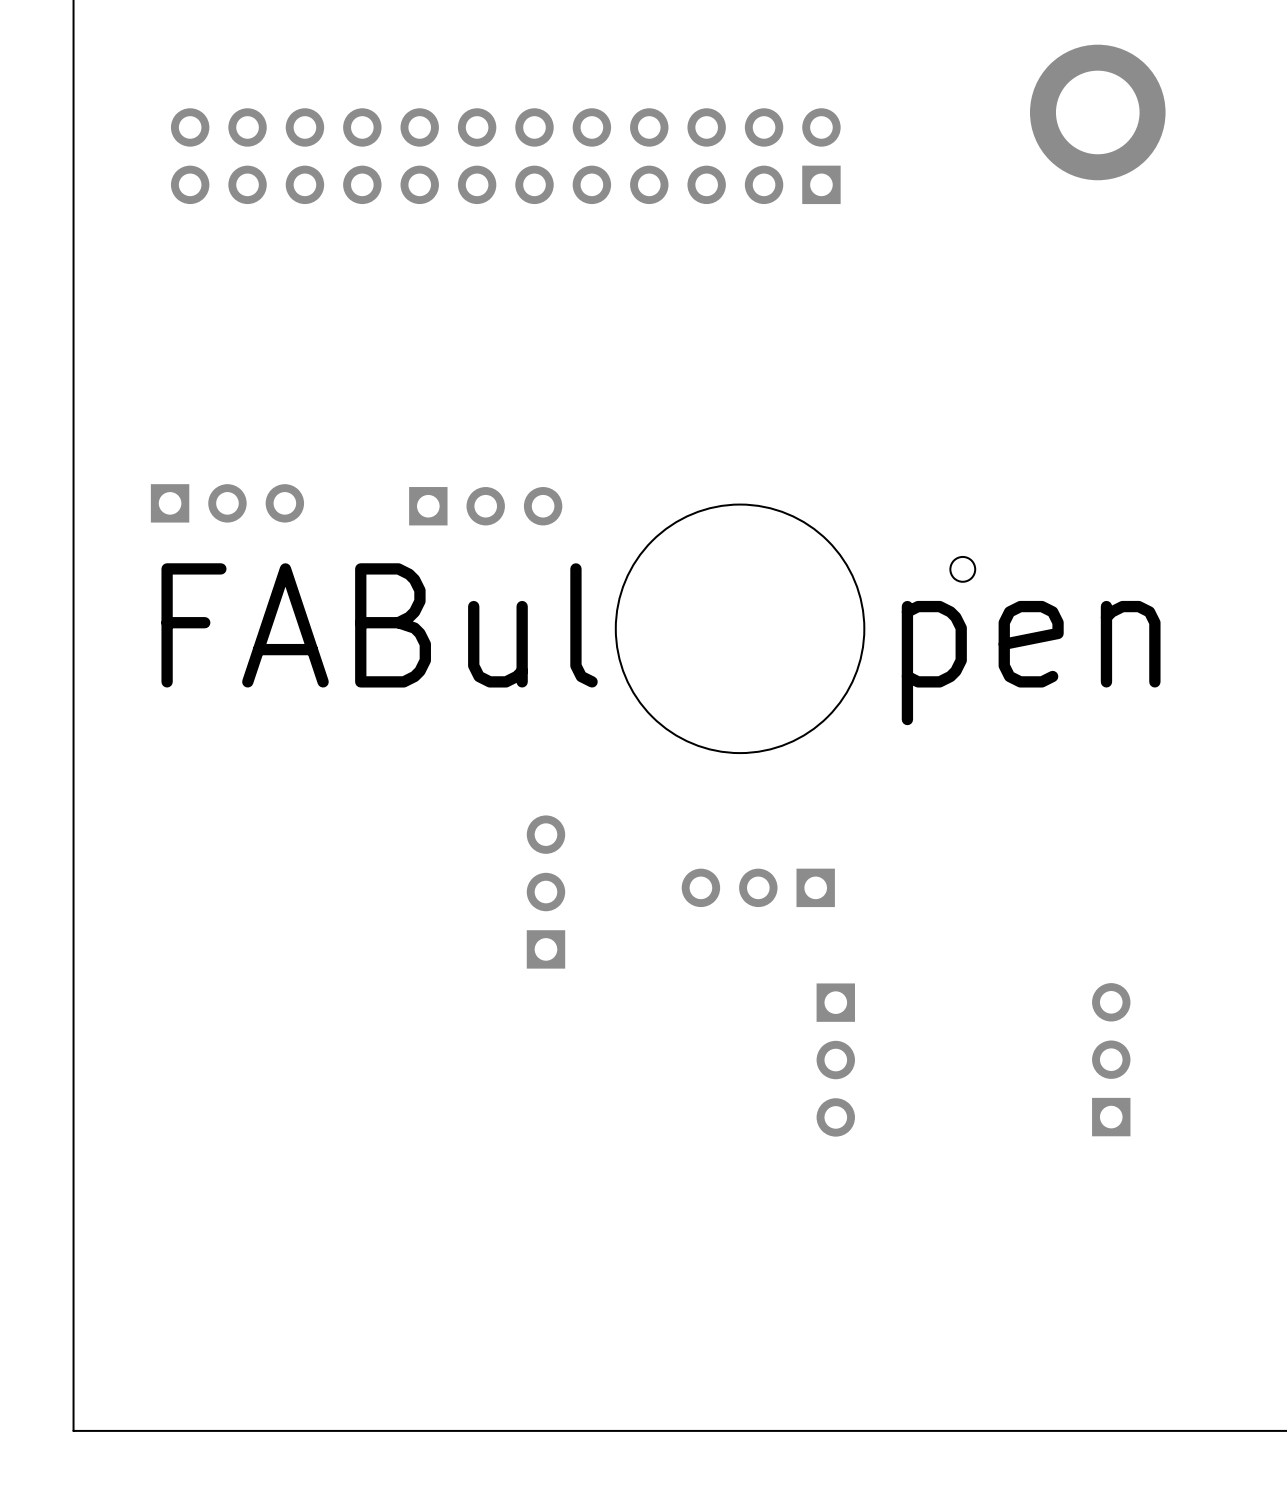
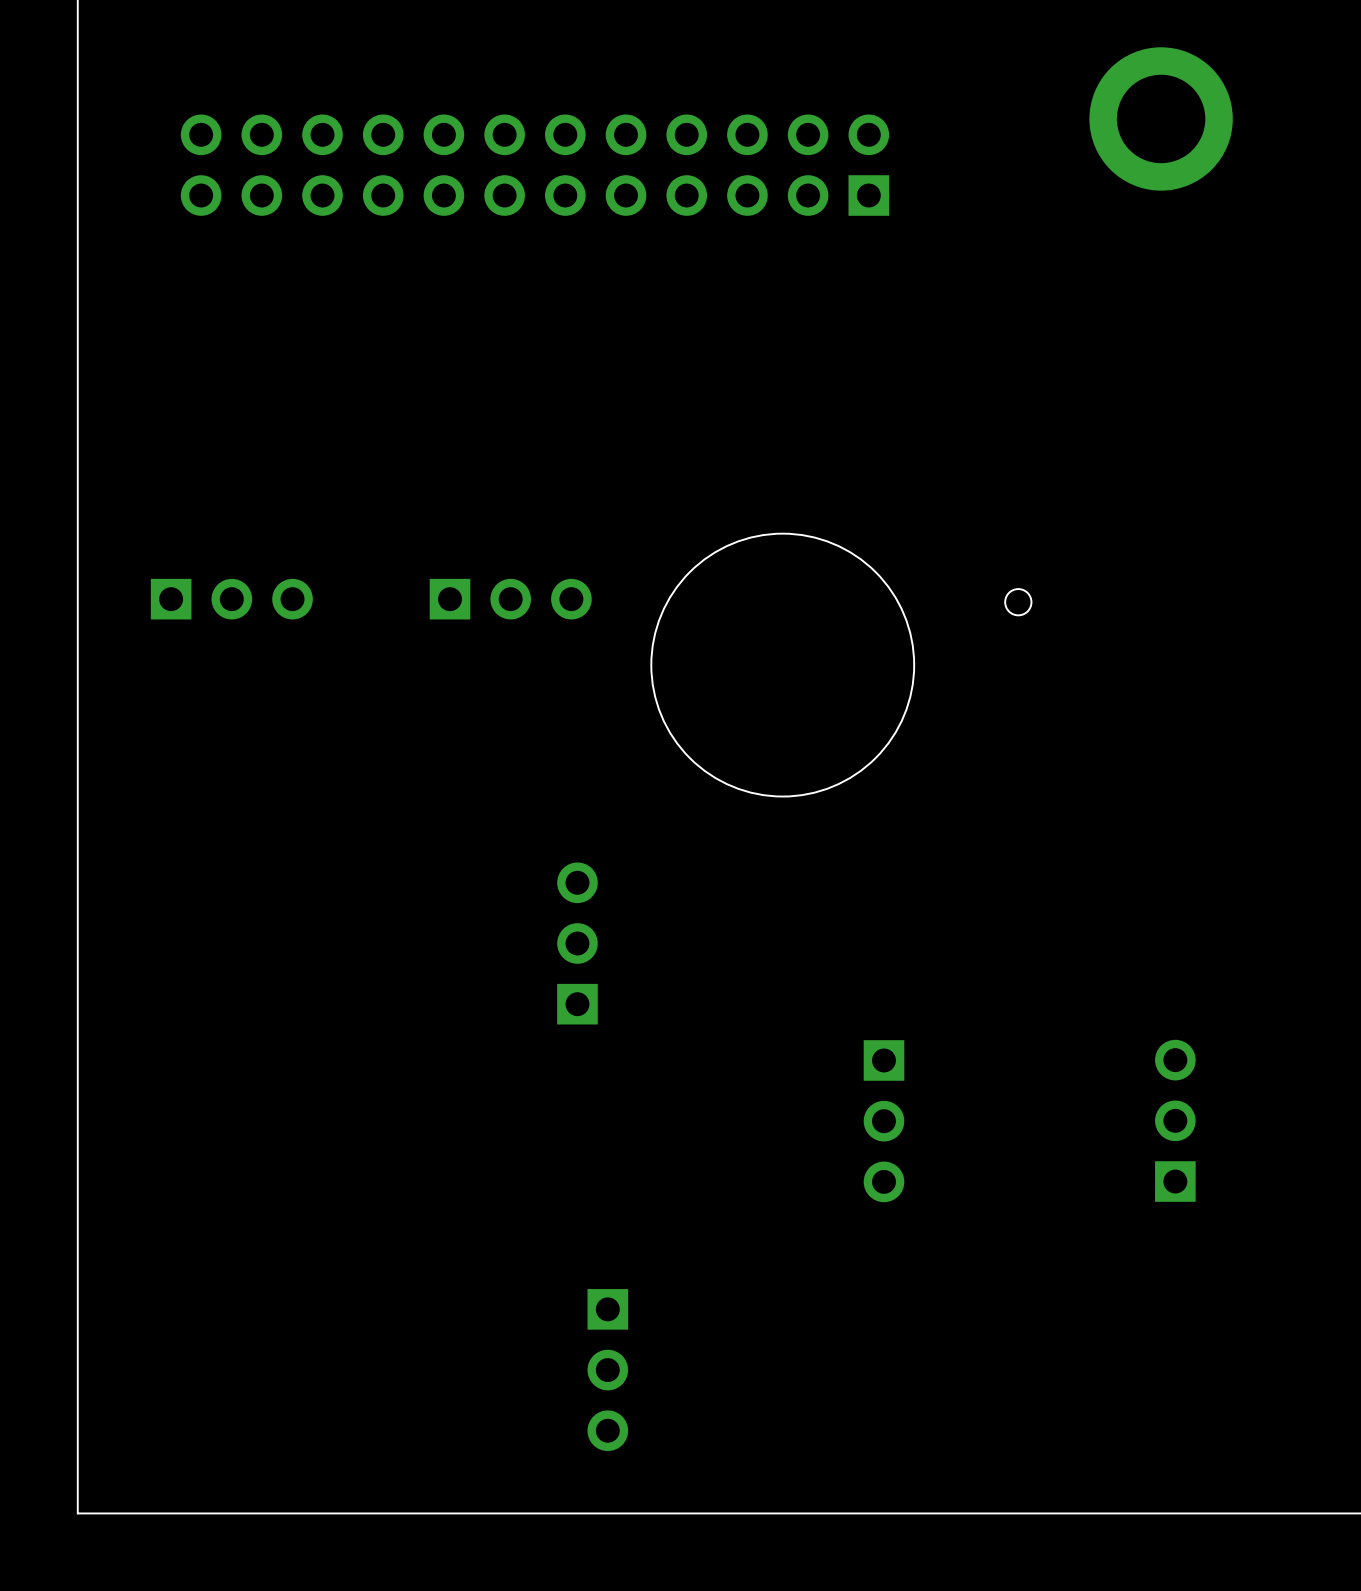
part position: (227, 503) -> (231, 599)
part position: (485, 506) -> (510, 599)
text: FABul (379, 625) -> none
text: pen (1031, 663) -> none
part: (758, 887) -> none
part: none -> (607, 1370)

